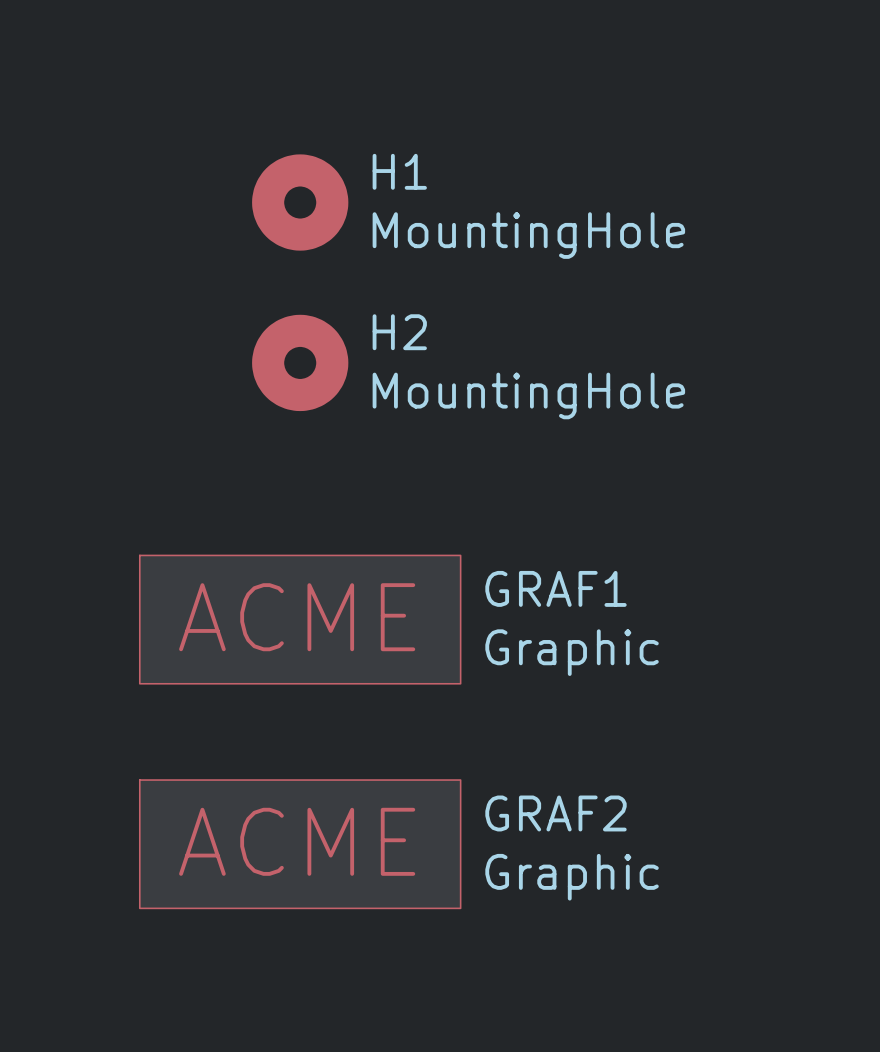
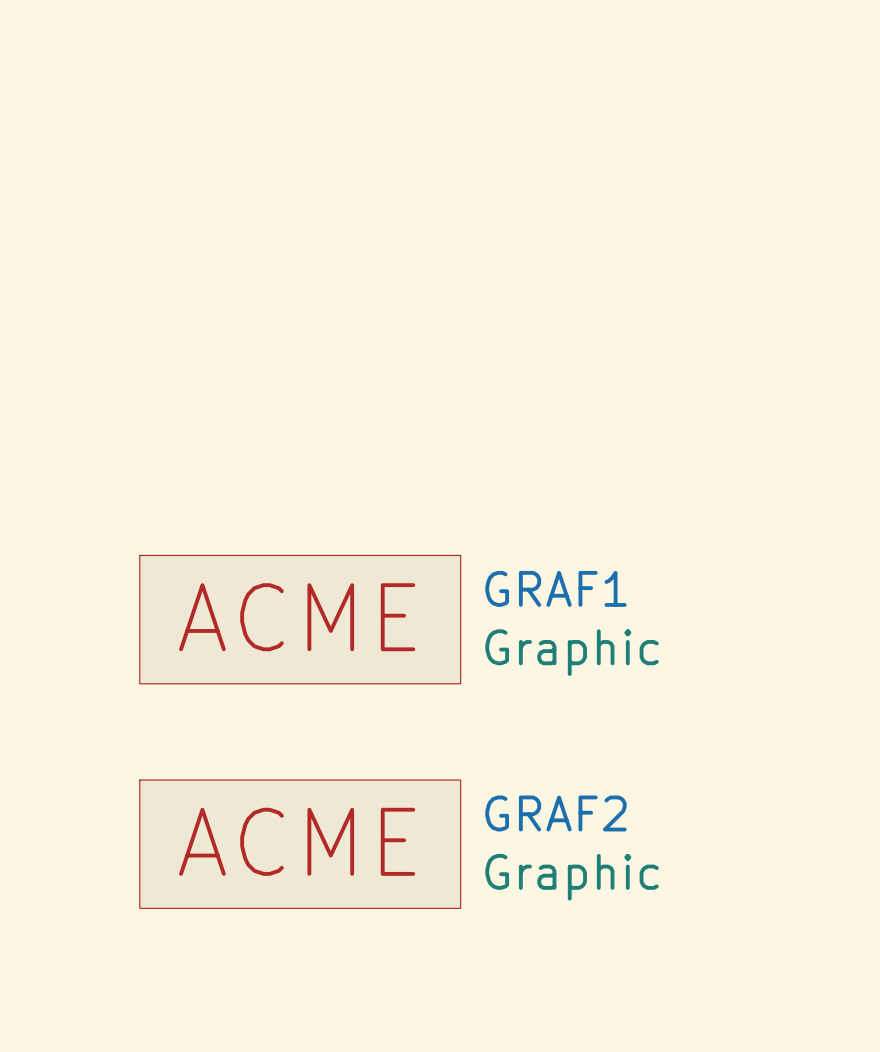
H1: MountingHole (300, 202) -> none
H2: MountingHole (300, 362) -> none

